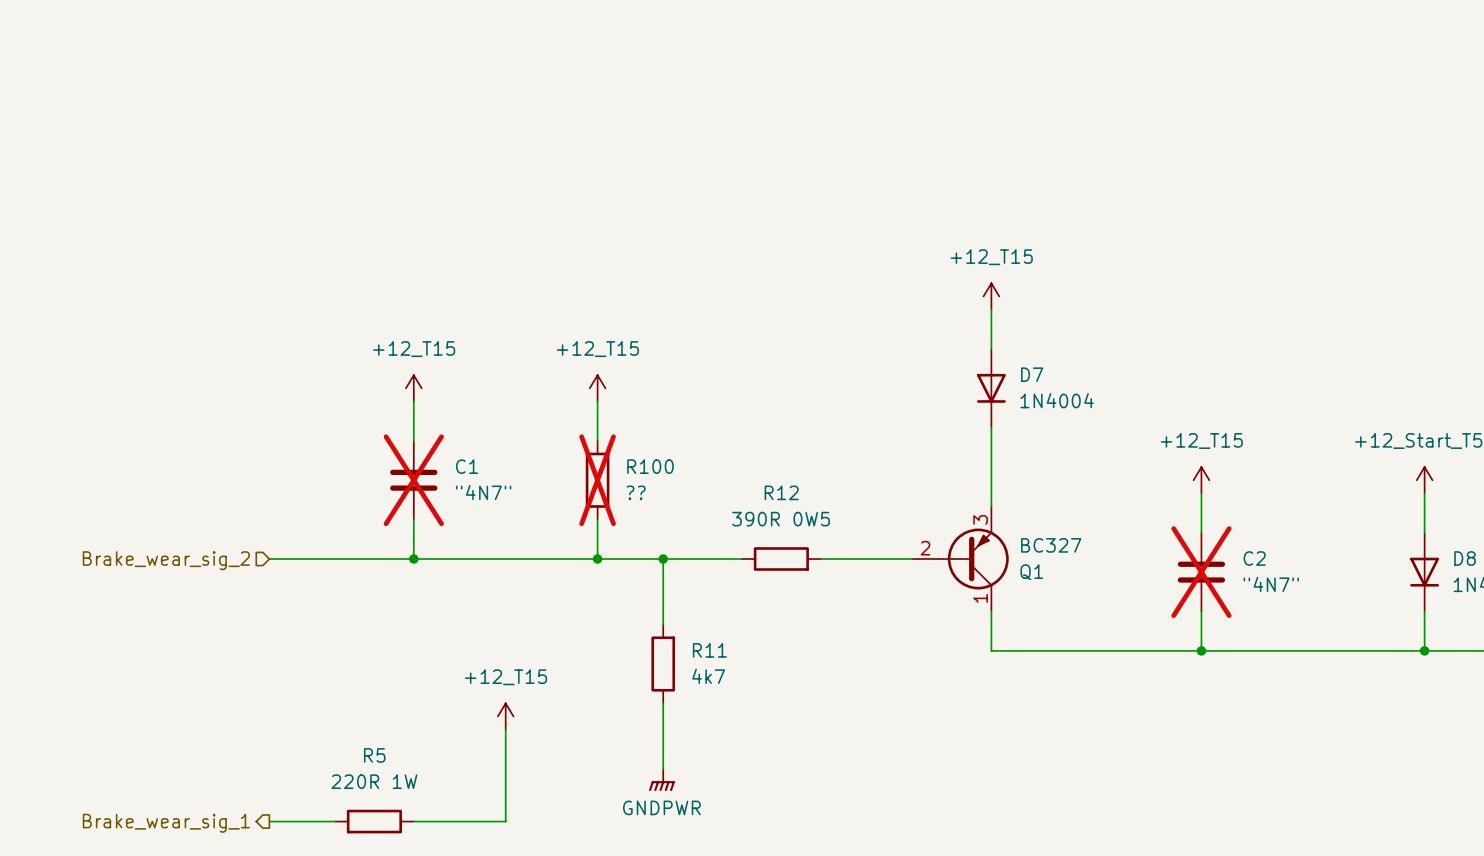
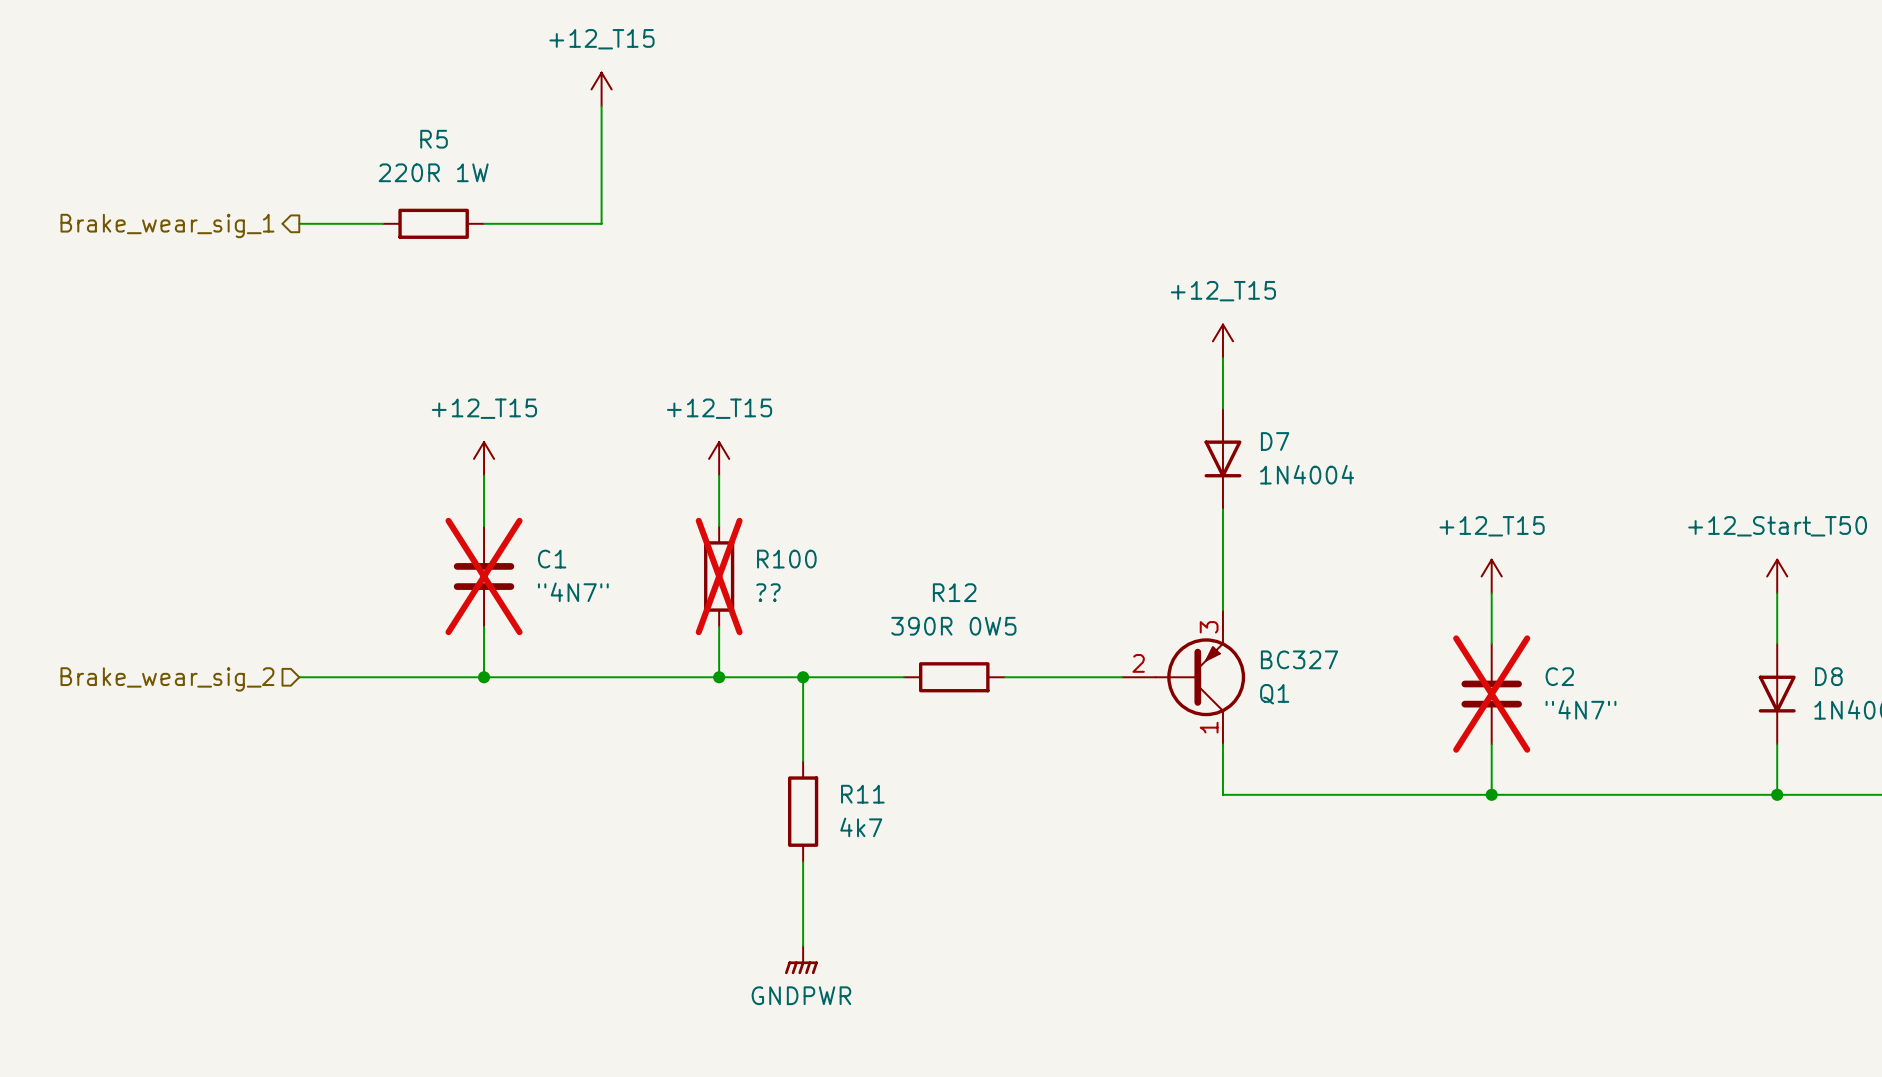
power symbol: none -> +12_T15 (601, 89)
wire: none -> (601, 106) (601, 223) (484, 223)
wire: none -> (299, 223) (383, 223)
hierarchical label: none -> Brake_wear_sig_1 (167, 225)
power symbol: +12_T15 (505, 716) -> none
wire: (505, 729) (505, 821) (413, 821) -> none
wire: (269, 821) (335, 821) -> none
R5 position: (374, 821) -> (433, 223)
hierarchical label: Brake_wear_sig_1 (166, 823) -> none

